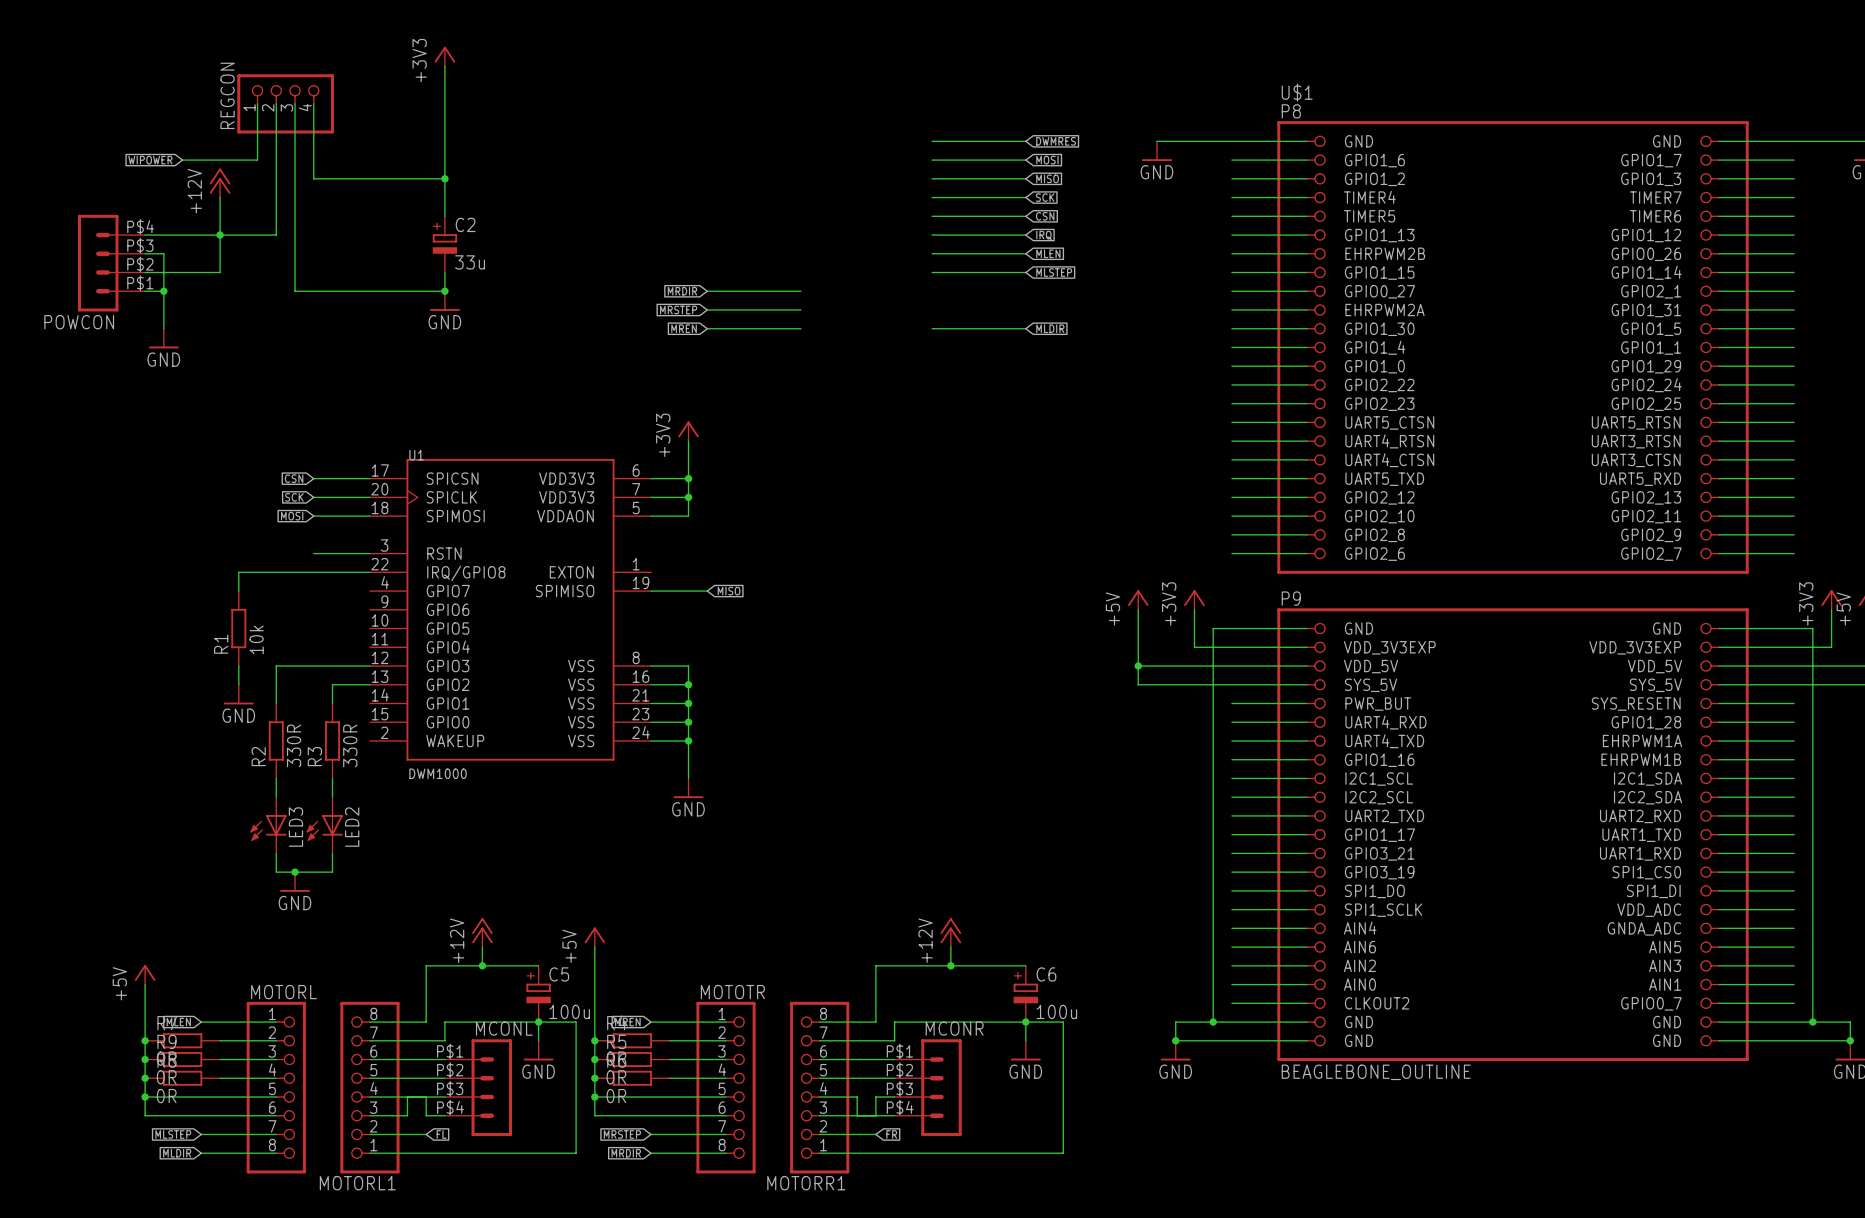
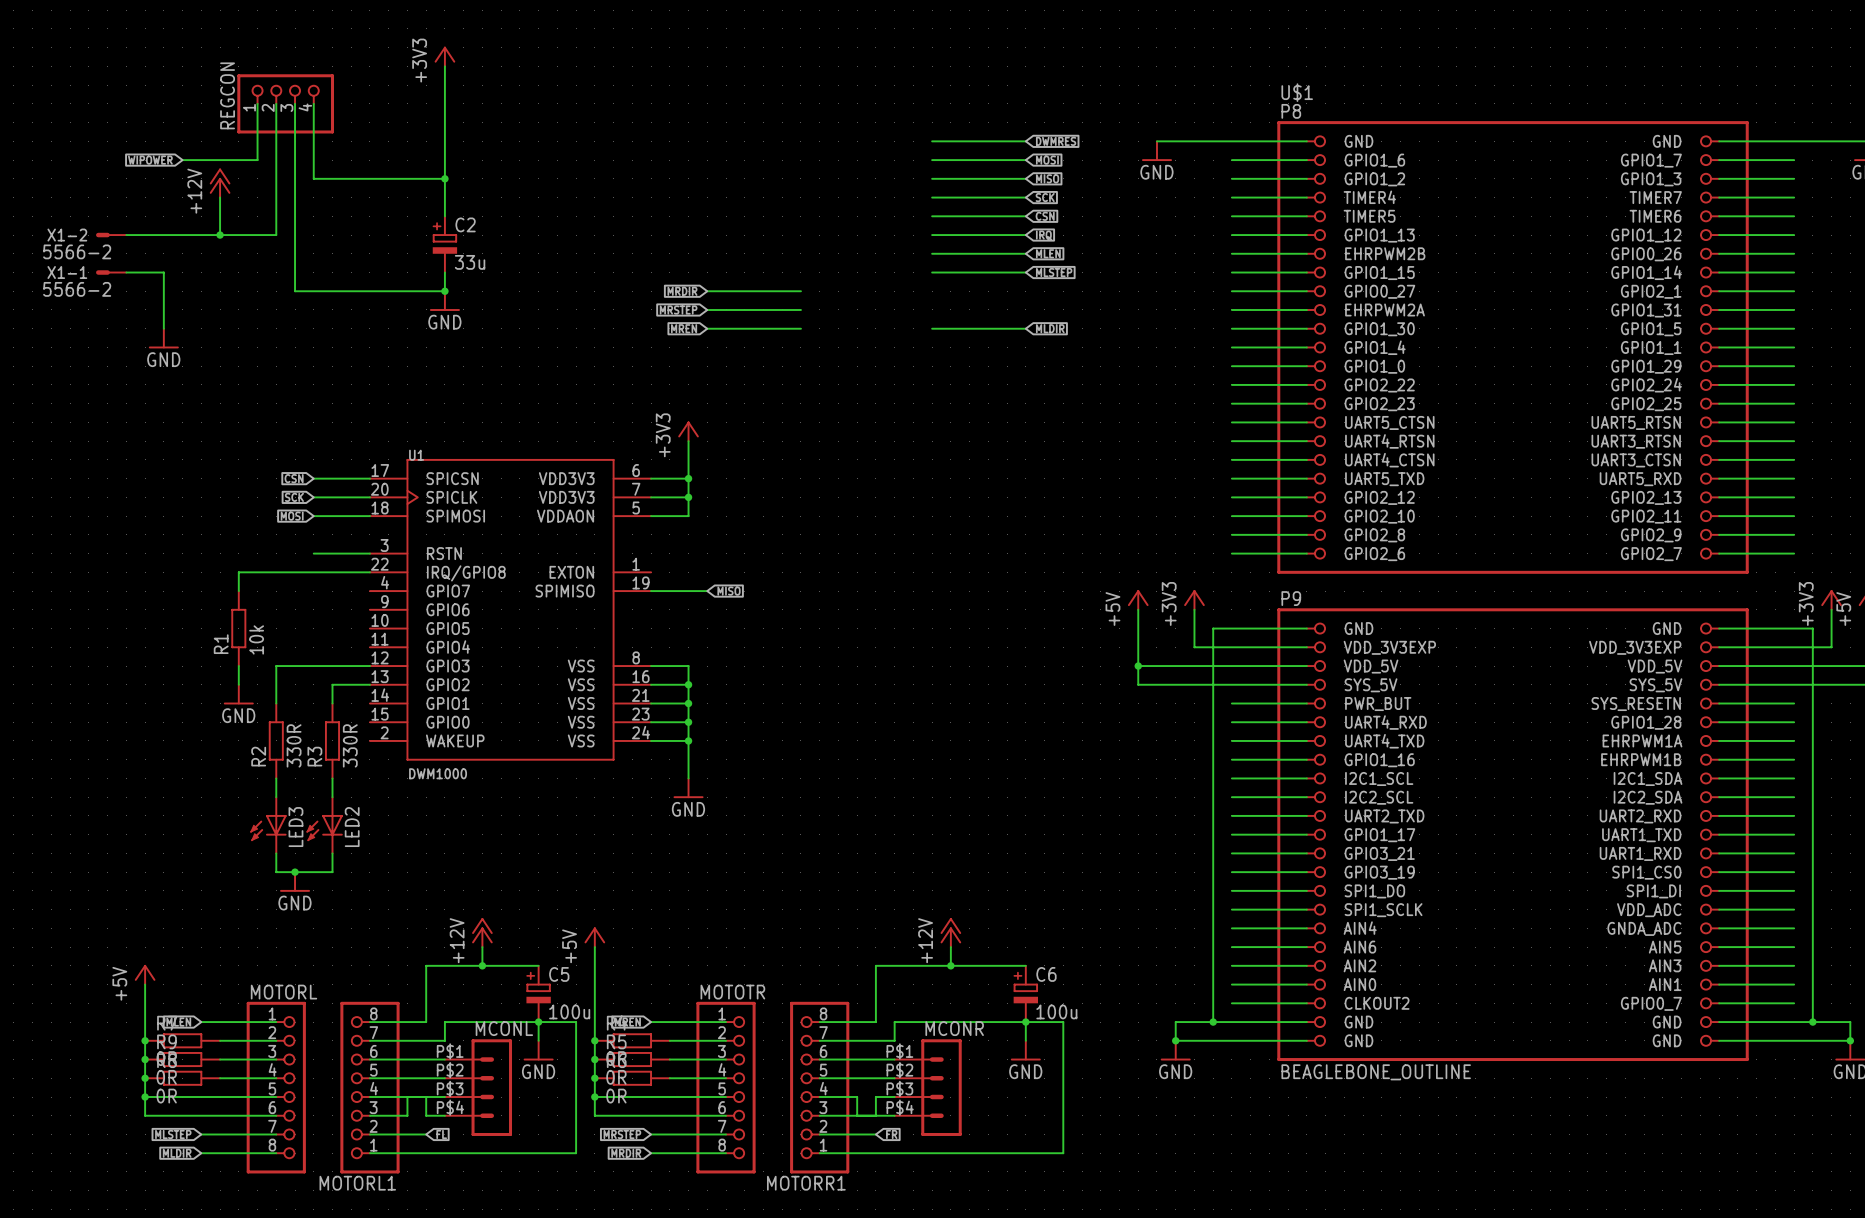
X1-2: none -> 5566-2 (111, 235)
wire: (220, 235) (220, 272) (163, 272) (163, 253) (145, 253) -> none
POWCON: (111, 263) -> none
X1-1: none -> 5566-2 (111, 272)
junction: (163, 291) -> none

